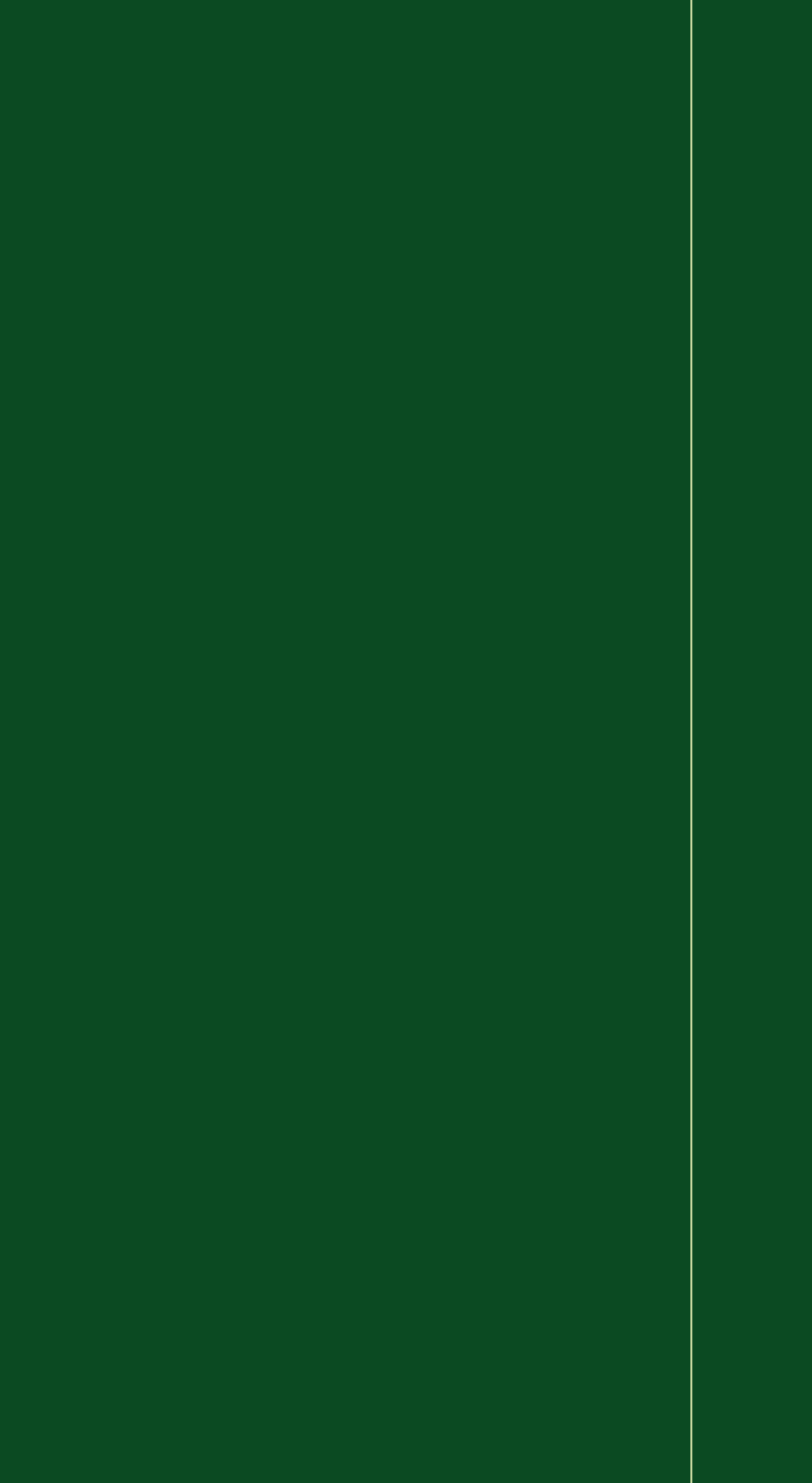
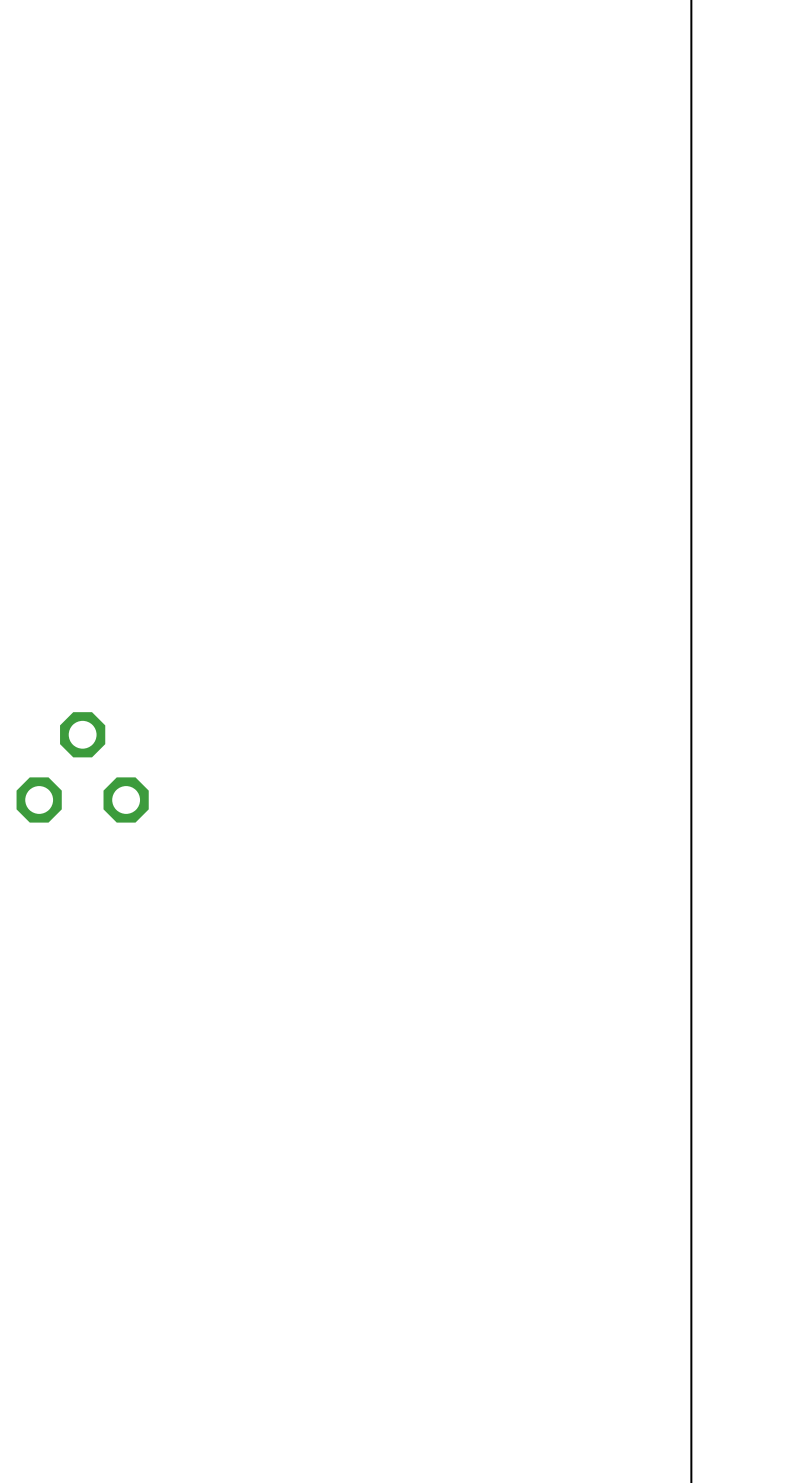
part: none -> (82, 767)

